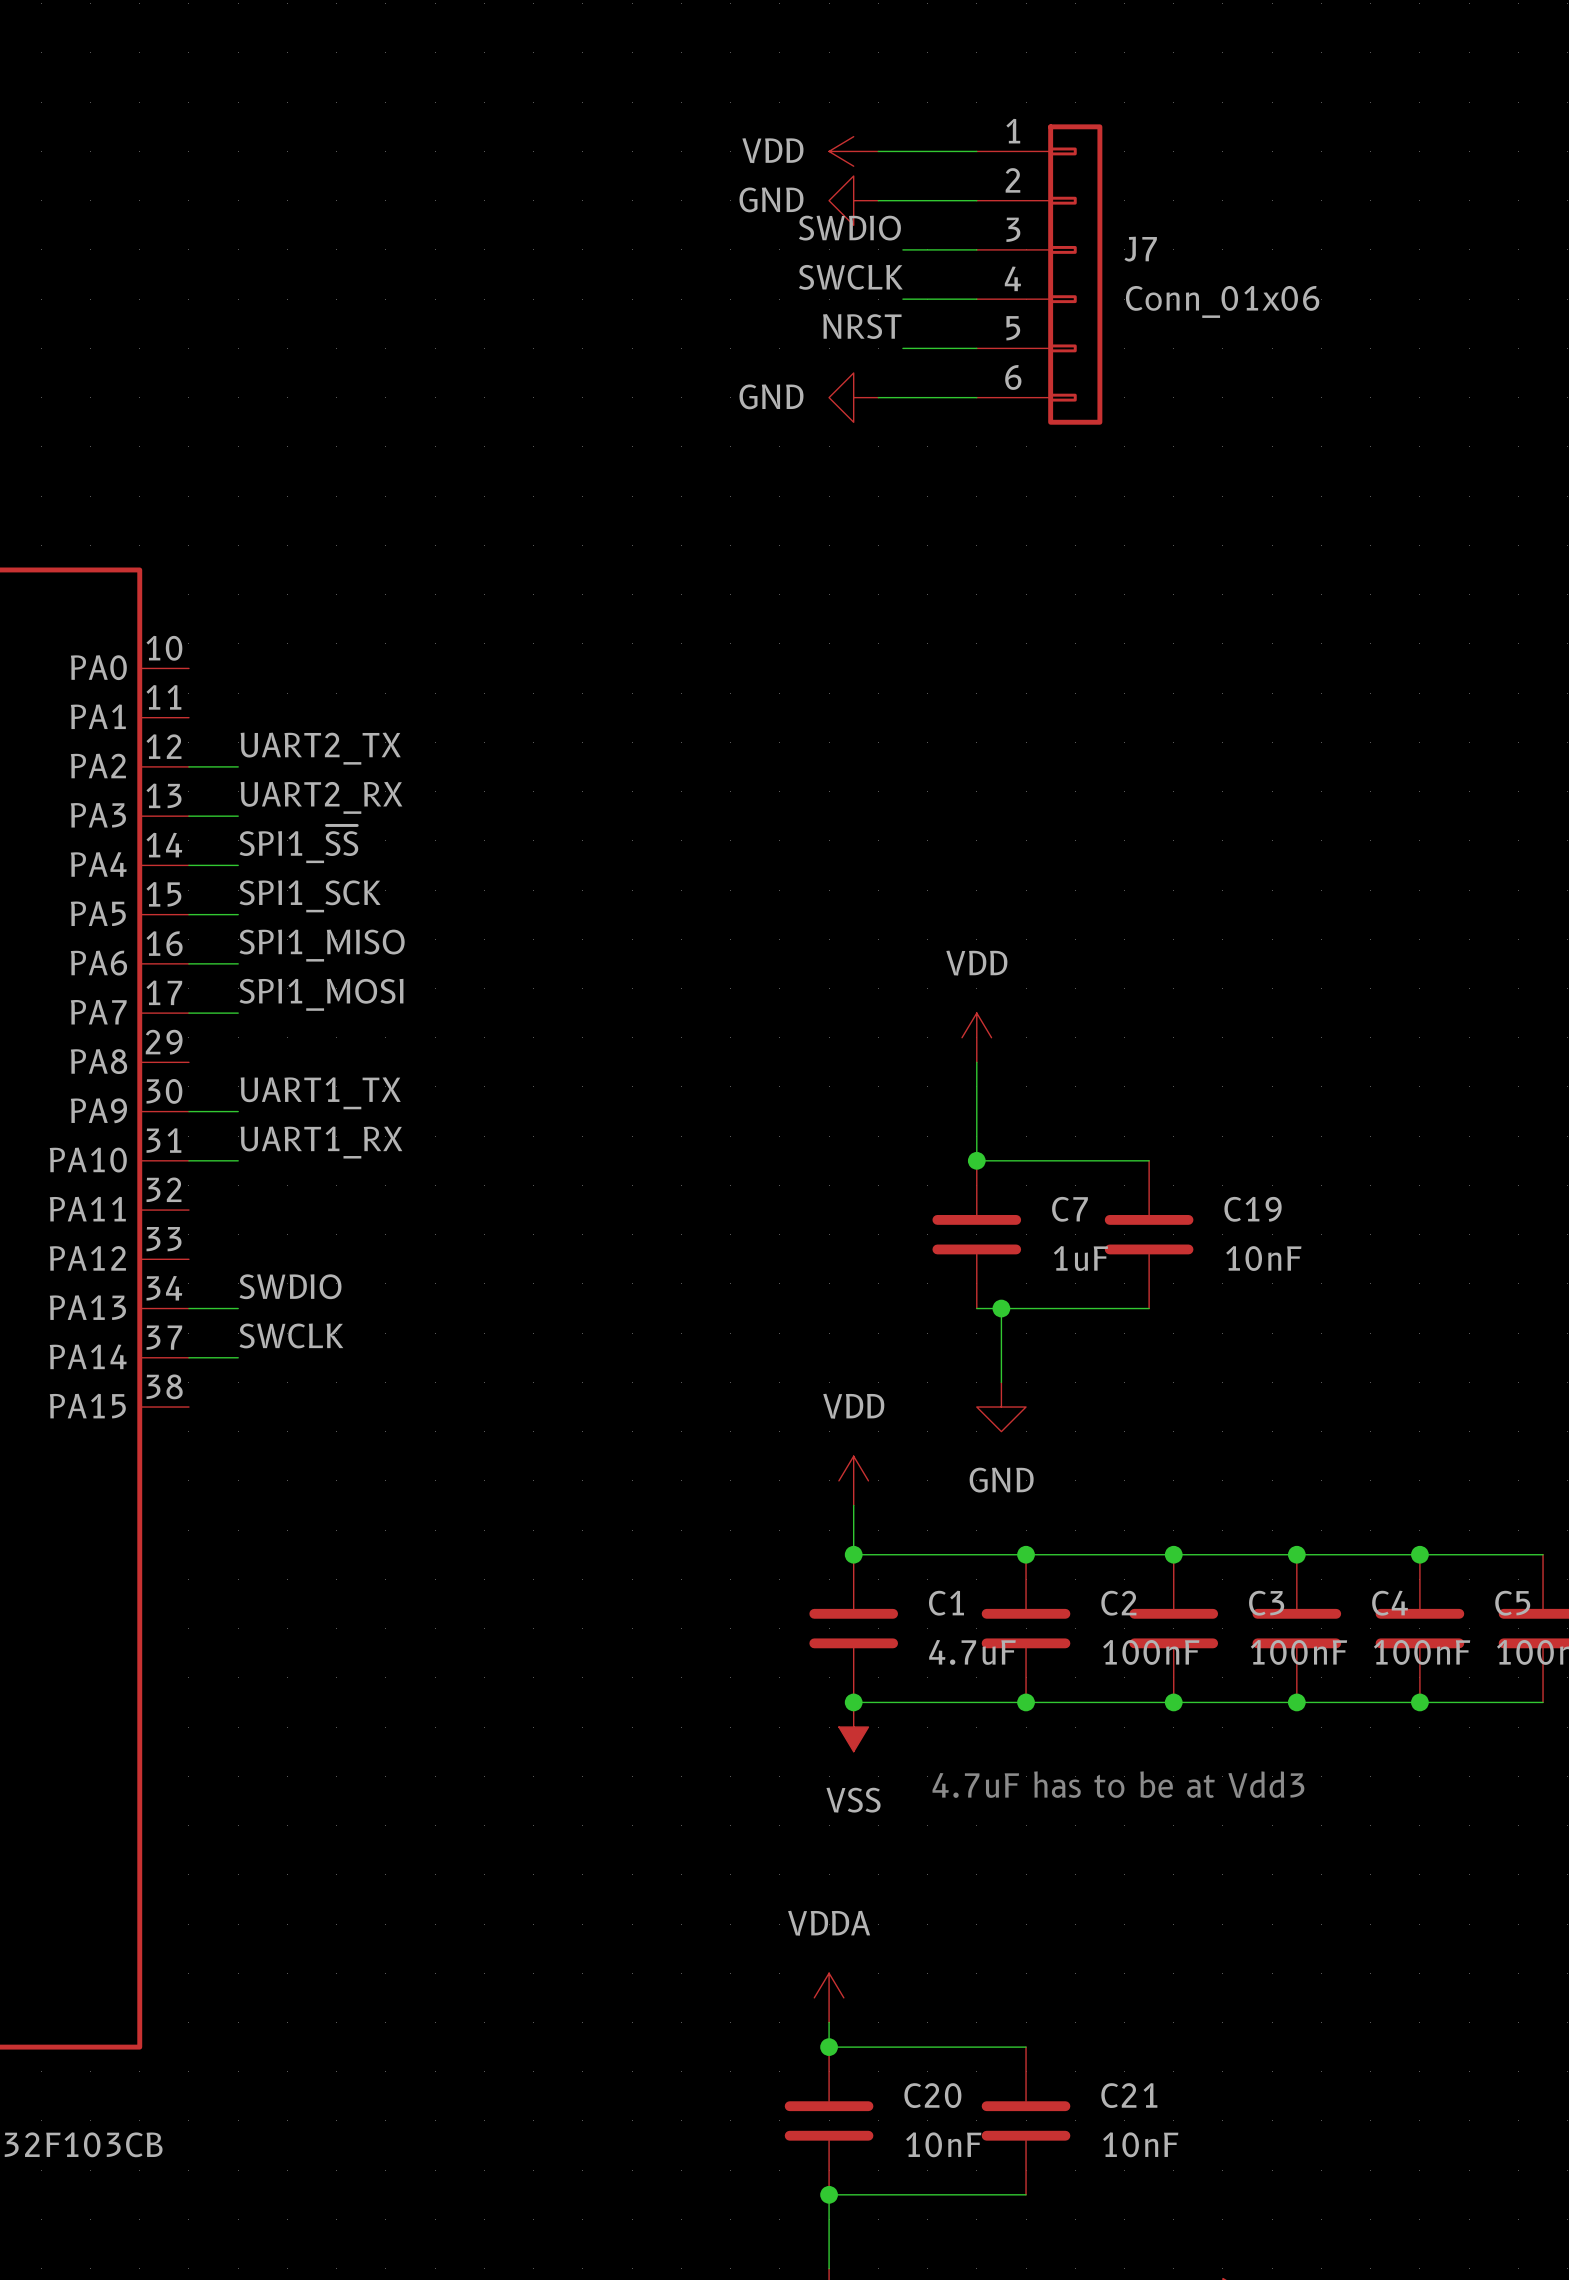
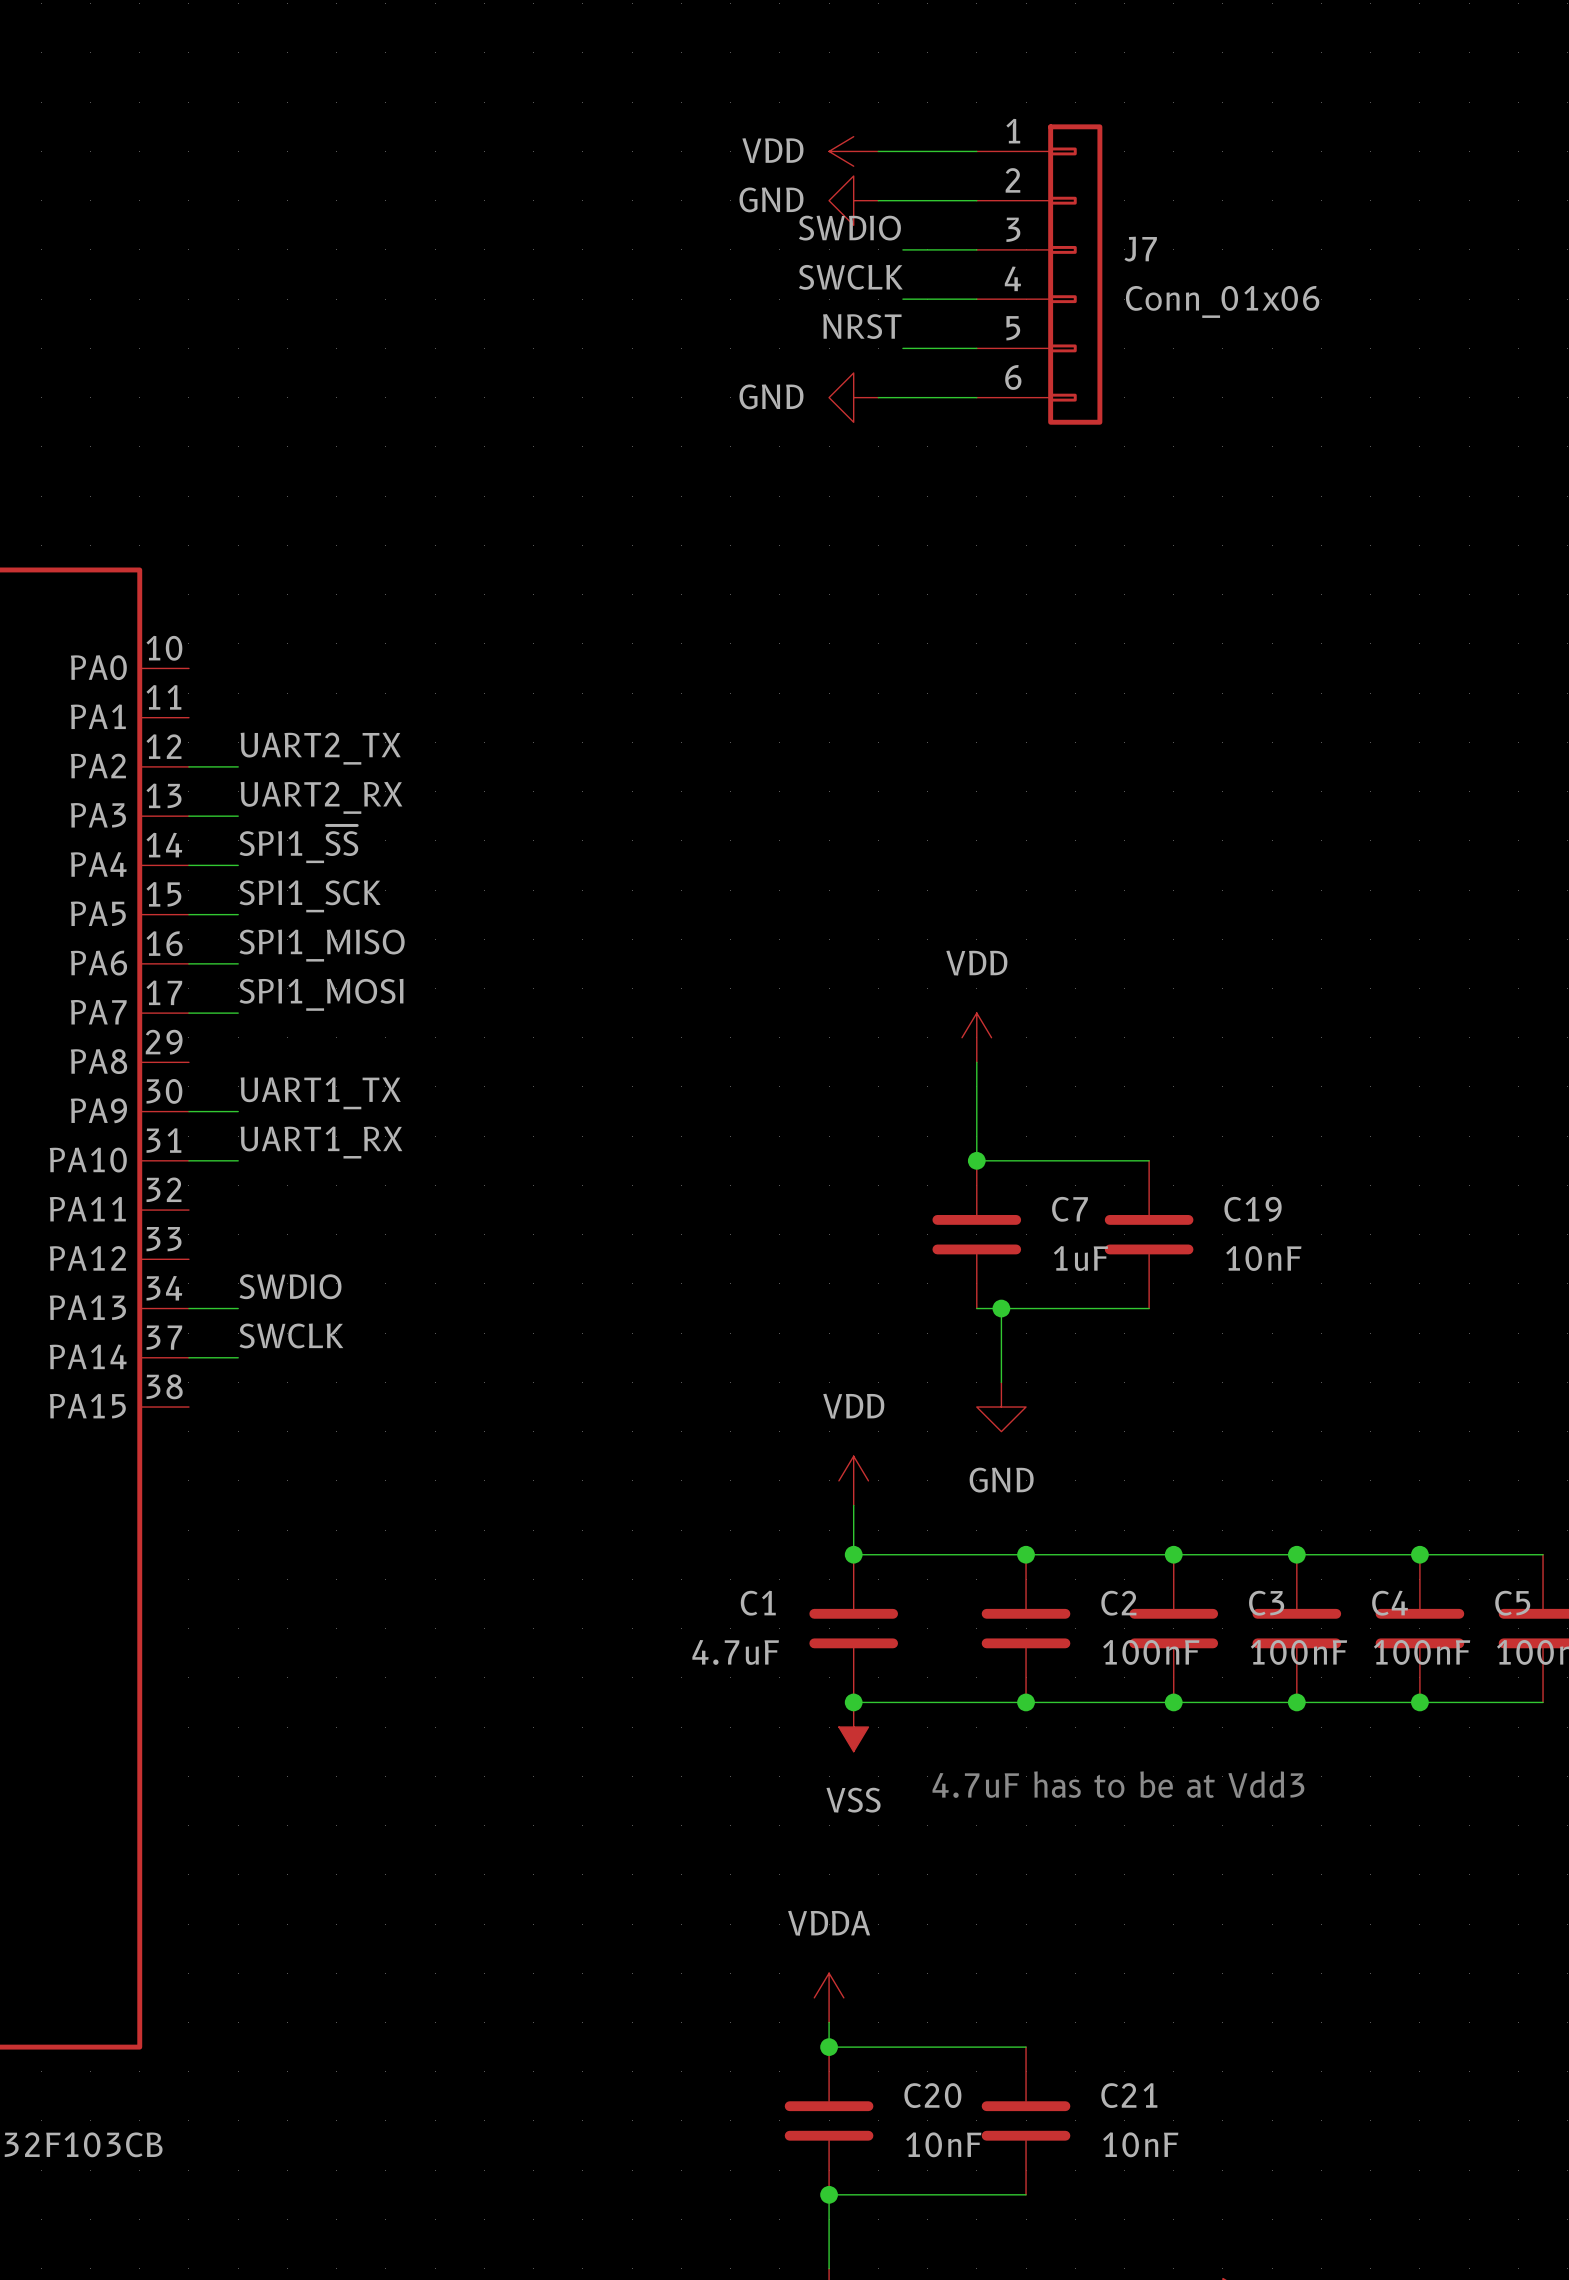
C1 name position: C1 (946, 1603) -> C1 (758, 1603)
C1 value position: 4.7uF (972, 1652) -> 4.7uF (735, 1652)

